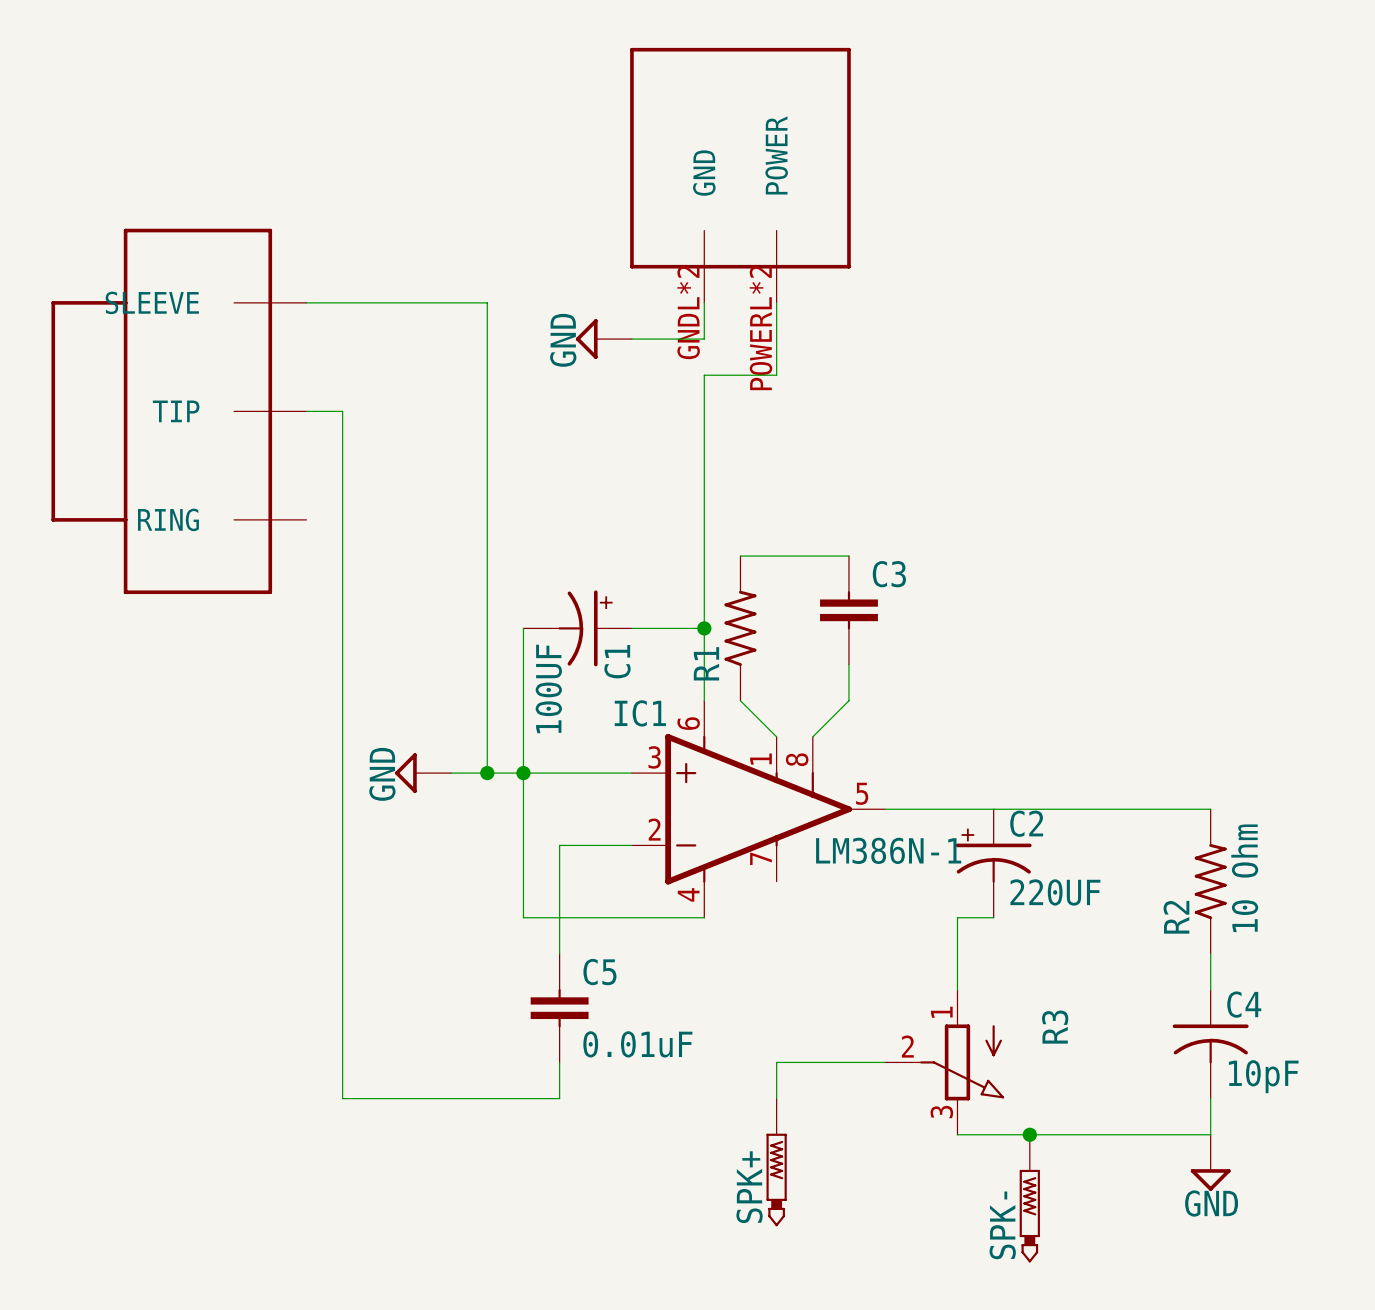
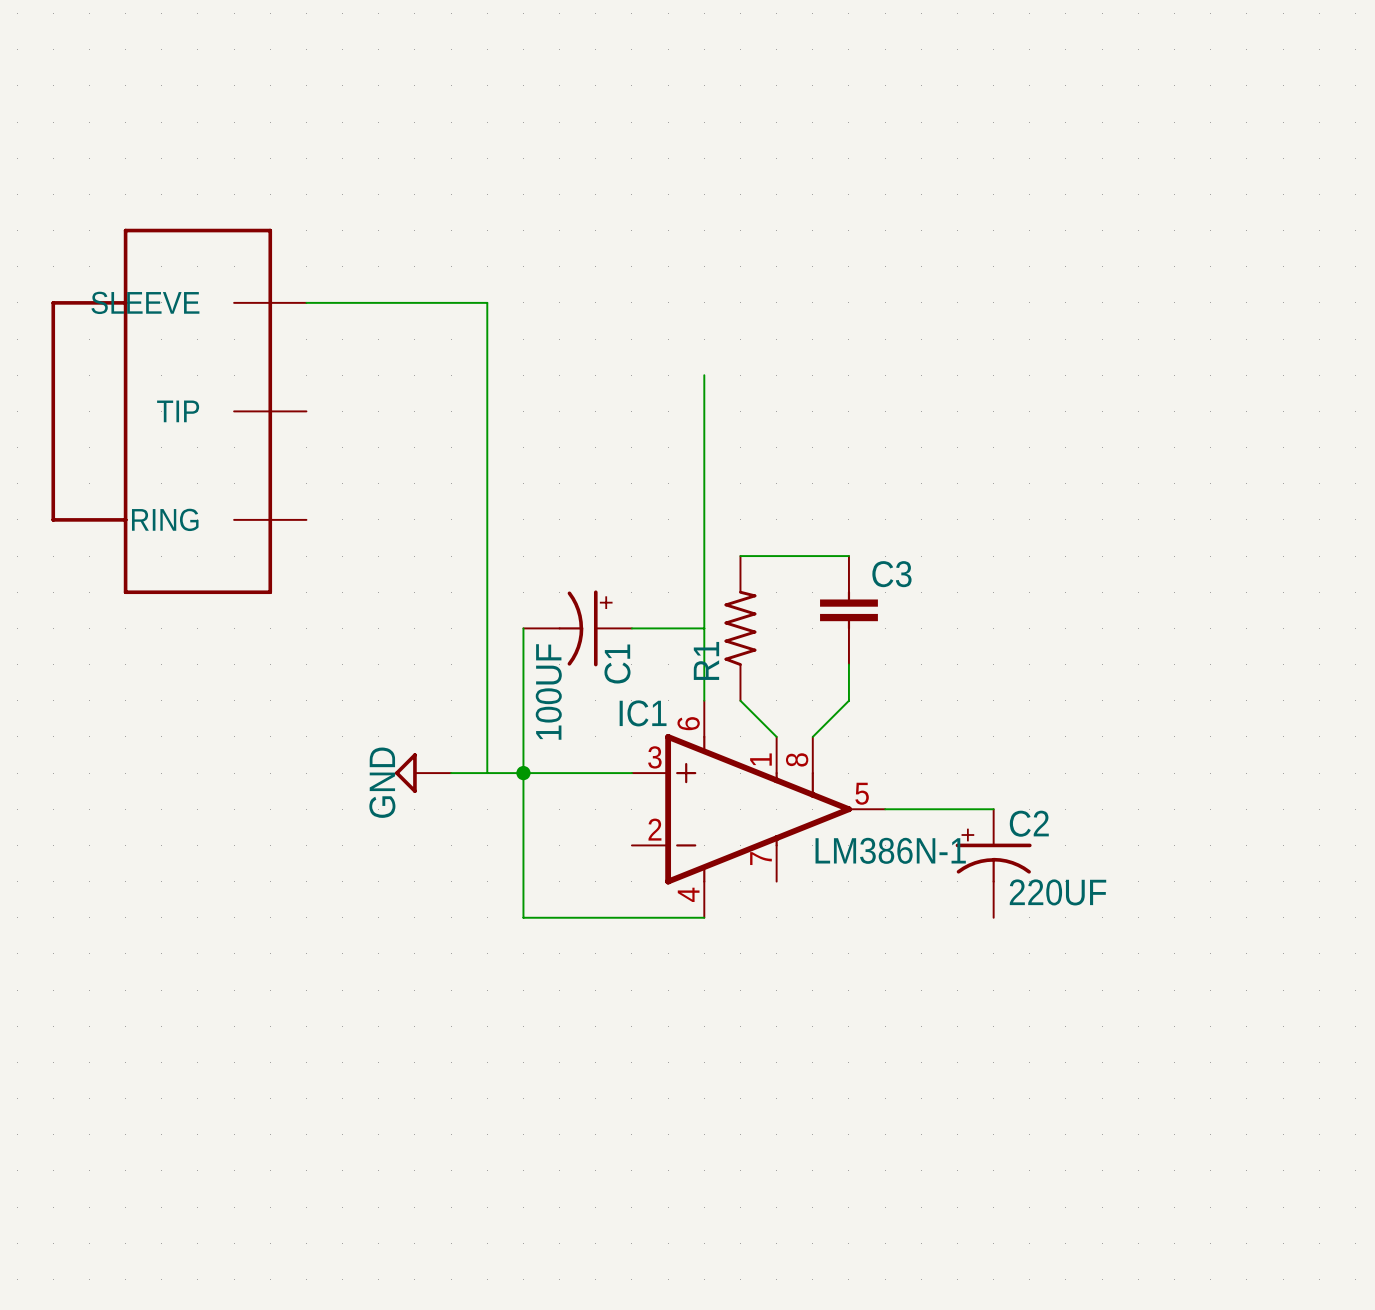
part: (740, 175) -> none
wire: (704, 302) (704, 339) (631, 339) -> none
wire: (776, 302) (776, 375) (704, 375) -> none
power symbol: GND (603, 339) -> none
wire: (306, 411) (342, 411) (342, 1098) (559, 1098) (559, 1062) -> none
junction: (704, 628) -> none
junction: (487, 773) -> none
wire: (993, 809) (1210, 809) -> none
wire: (631, 845) (559, 845) (559, 953) -> none
R2: 10 Ohm (1210, 881) -> none
wire: (993, 917) (957, 917) (957, 990) -> none
wire: (1210, 953) (1210, 990) -> none
C5: 0.01uF (559, 1008) -> none
C4: 10pF (1210, 1044) -> none
wire: (885, 1062) (776, 1062) (776, 1098) -> none
R3: (944, 1062) -> none
wire: (1210, 1098) (1210, 1134) (957, 1134) -> none
junction: (1029, 1134) -> none
SPK+: (776, 1162) -> none
power symbol: GND (1210, 1162) -> none
SPK-: (1029, 1198) -> none

